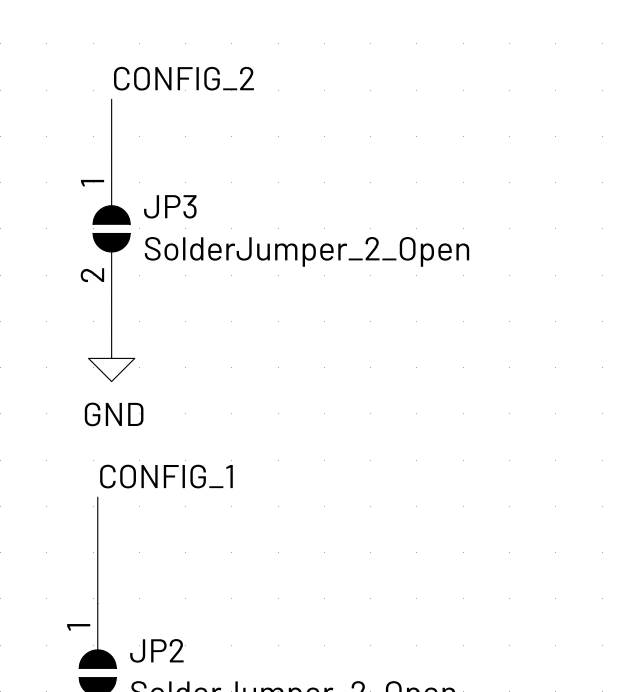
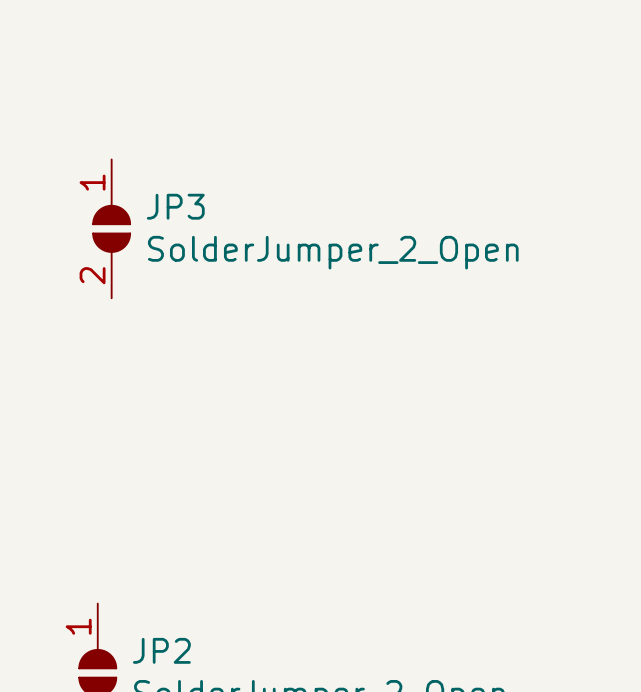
label: CONFIG_2 (183, 78) -> none
wire: (111, 99) (111, 159) -> none
wire: (111, 298) (111, 335) -> none
power symbol: GND (111, 358) -> none
label: CONFIG_1 (166, 476) -> none
wire: (97, 497) (97, 603) -> none

